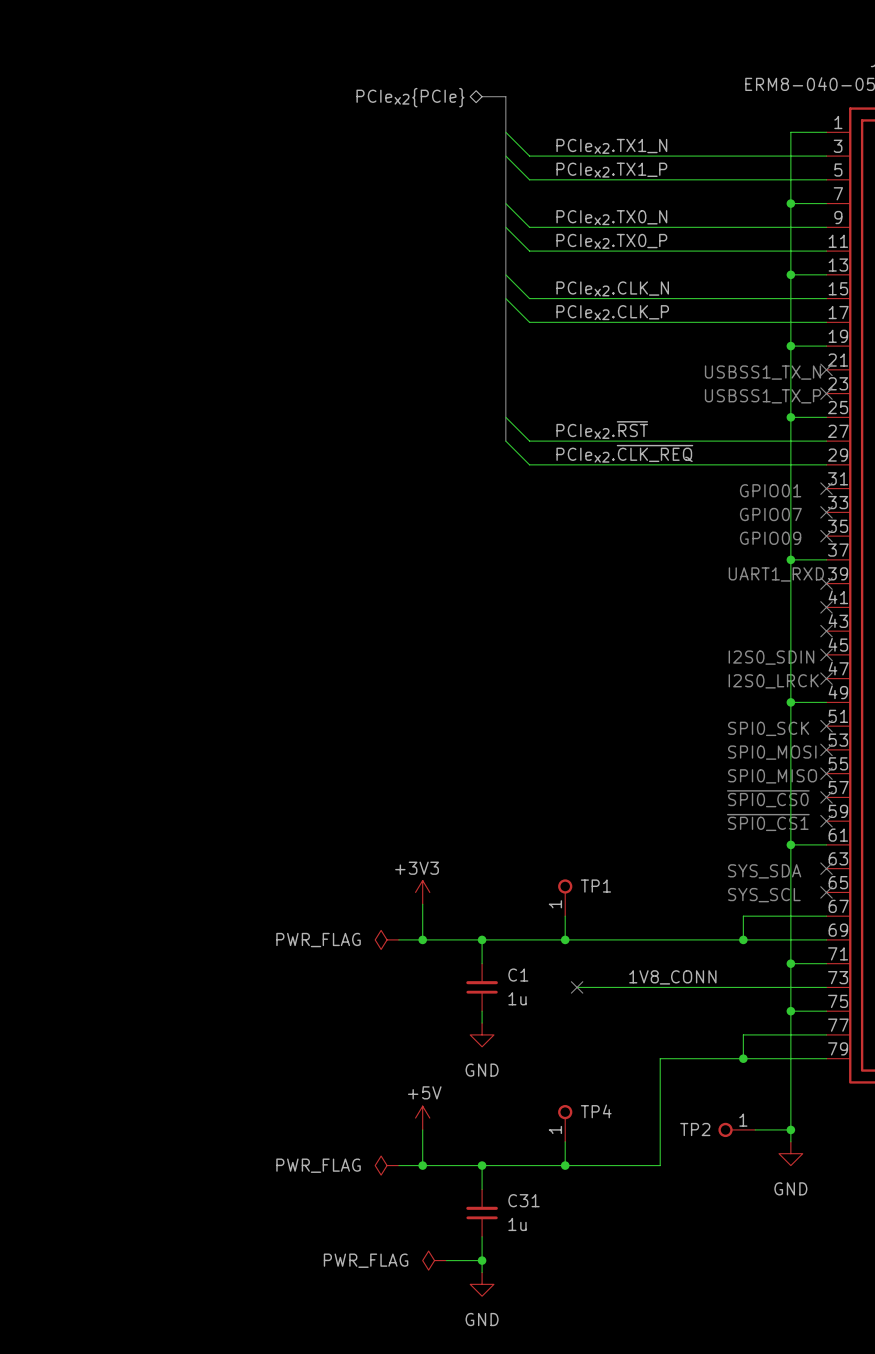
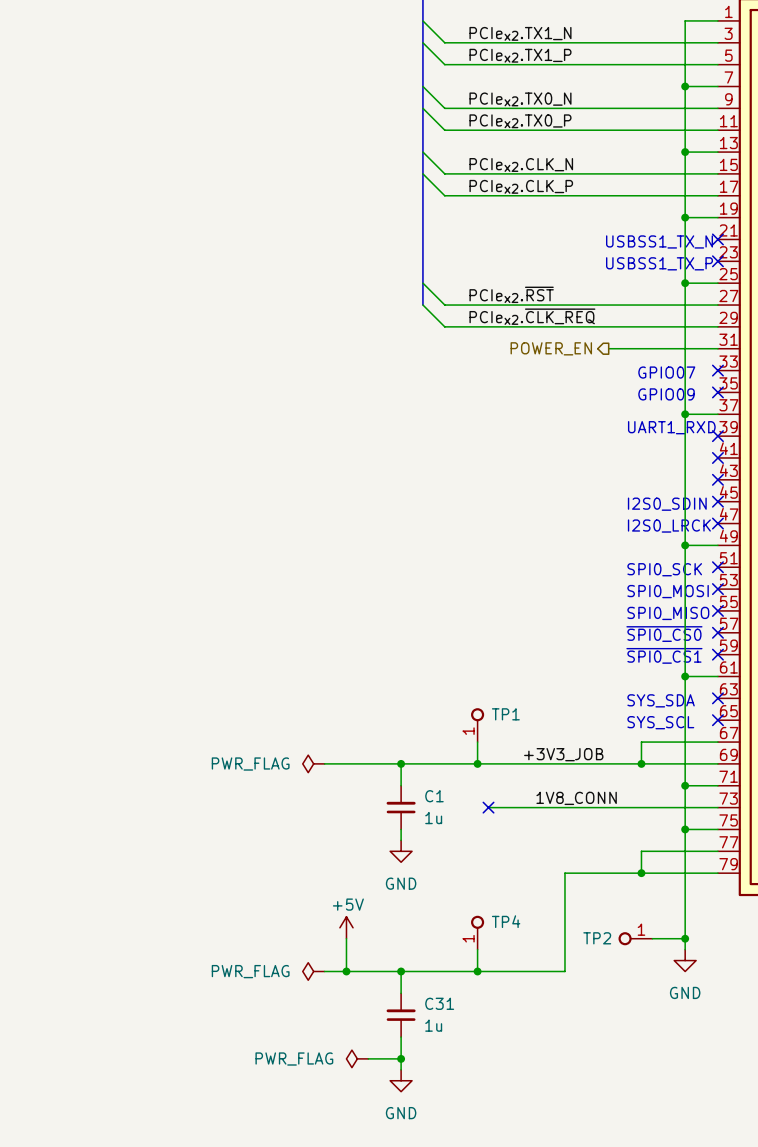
hierarchical label: none -> POWER_EN (551, 348)
wire: none -> (608, 348) (717, 348)
no-connect mark: (826, 488) -> none
text: GPIO01 (770, 490) -> none
power symbol: +3V3 (422, 892) -> none
wire: (422, 904) (422, 939) -> none
label: none -> +3V3_JOB (563, 754)
junction: (422, 939) -> none

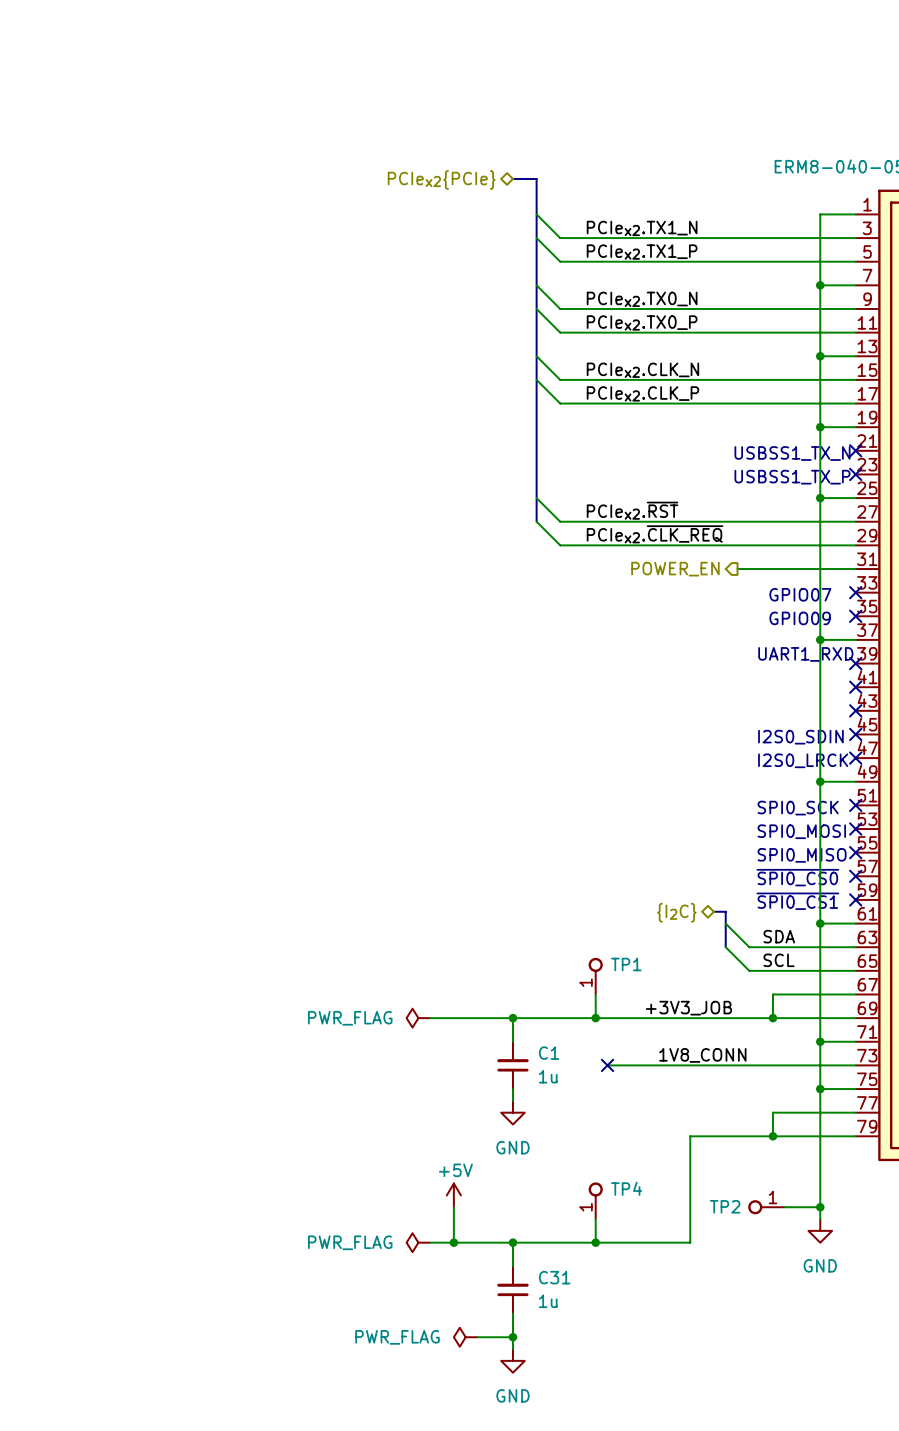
bus: none -> (713, 911) (725, 911) (725, 947)
hierarchical label: none -> {I2C} (676, 912)
wire: none -> (725, 923) (749, 947) (855, 947)
label: none -> SDA (779, 936)
wire: none -> (725, 947) (749, 970) (855, 970)
no-connect mark: (717, 698) -> none
text: SYS_SDA (661, 700) -> none
label: none -> SCL (778, 960)
no-connect mark: (717, 720) -> none
text: SYS_SCL (660, 722) -> none

